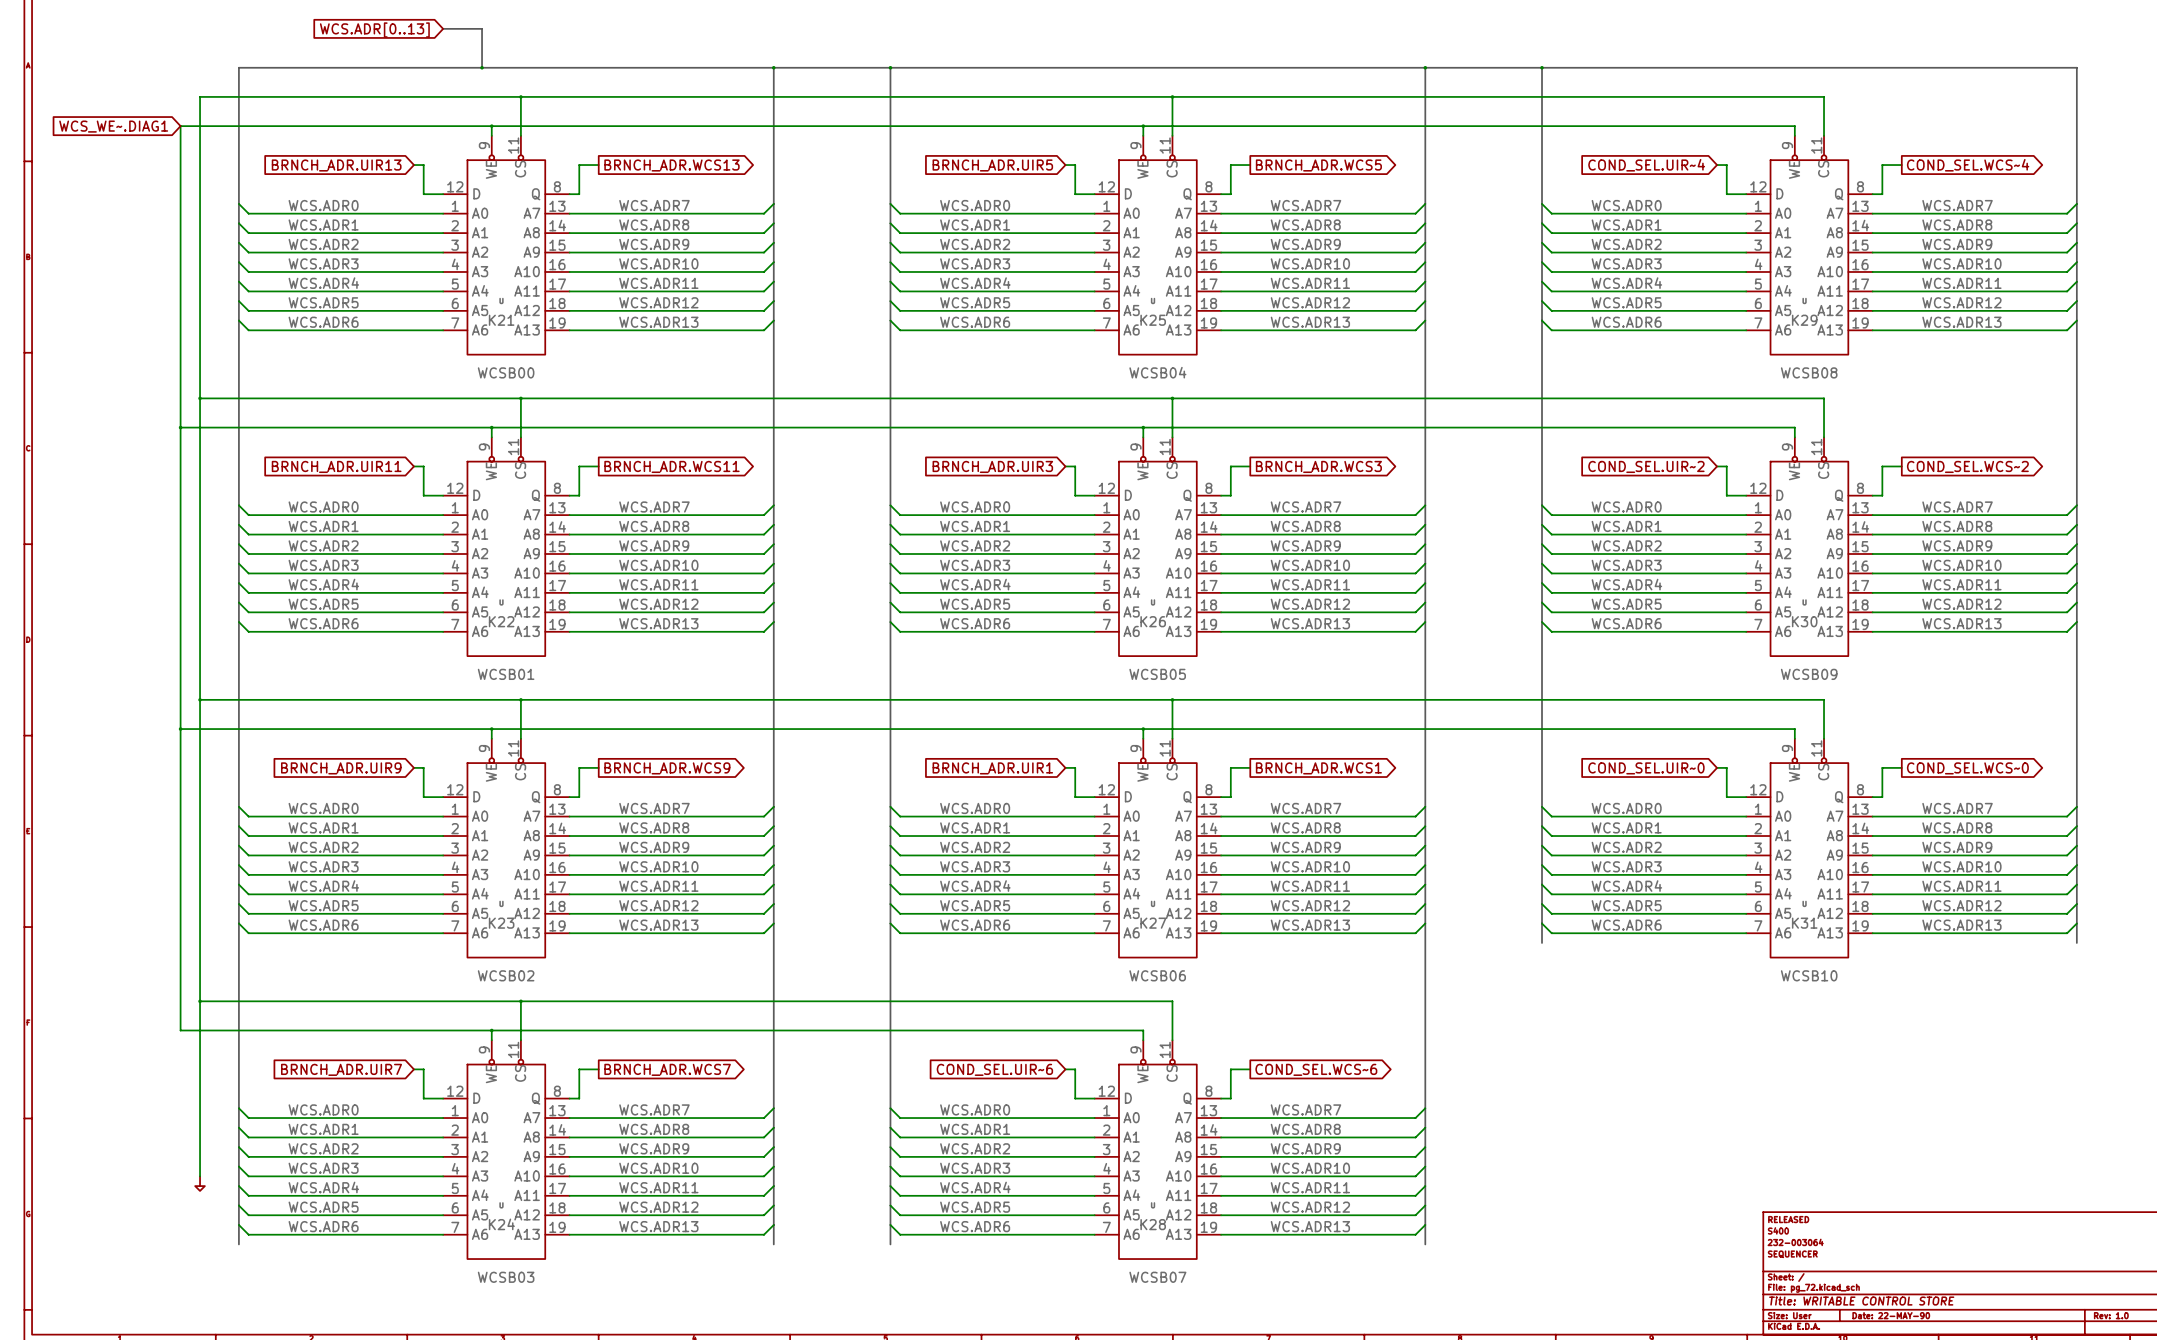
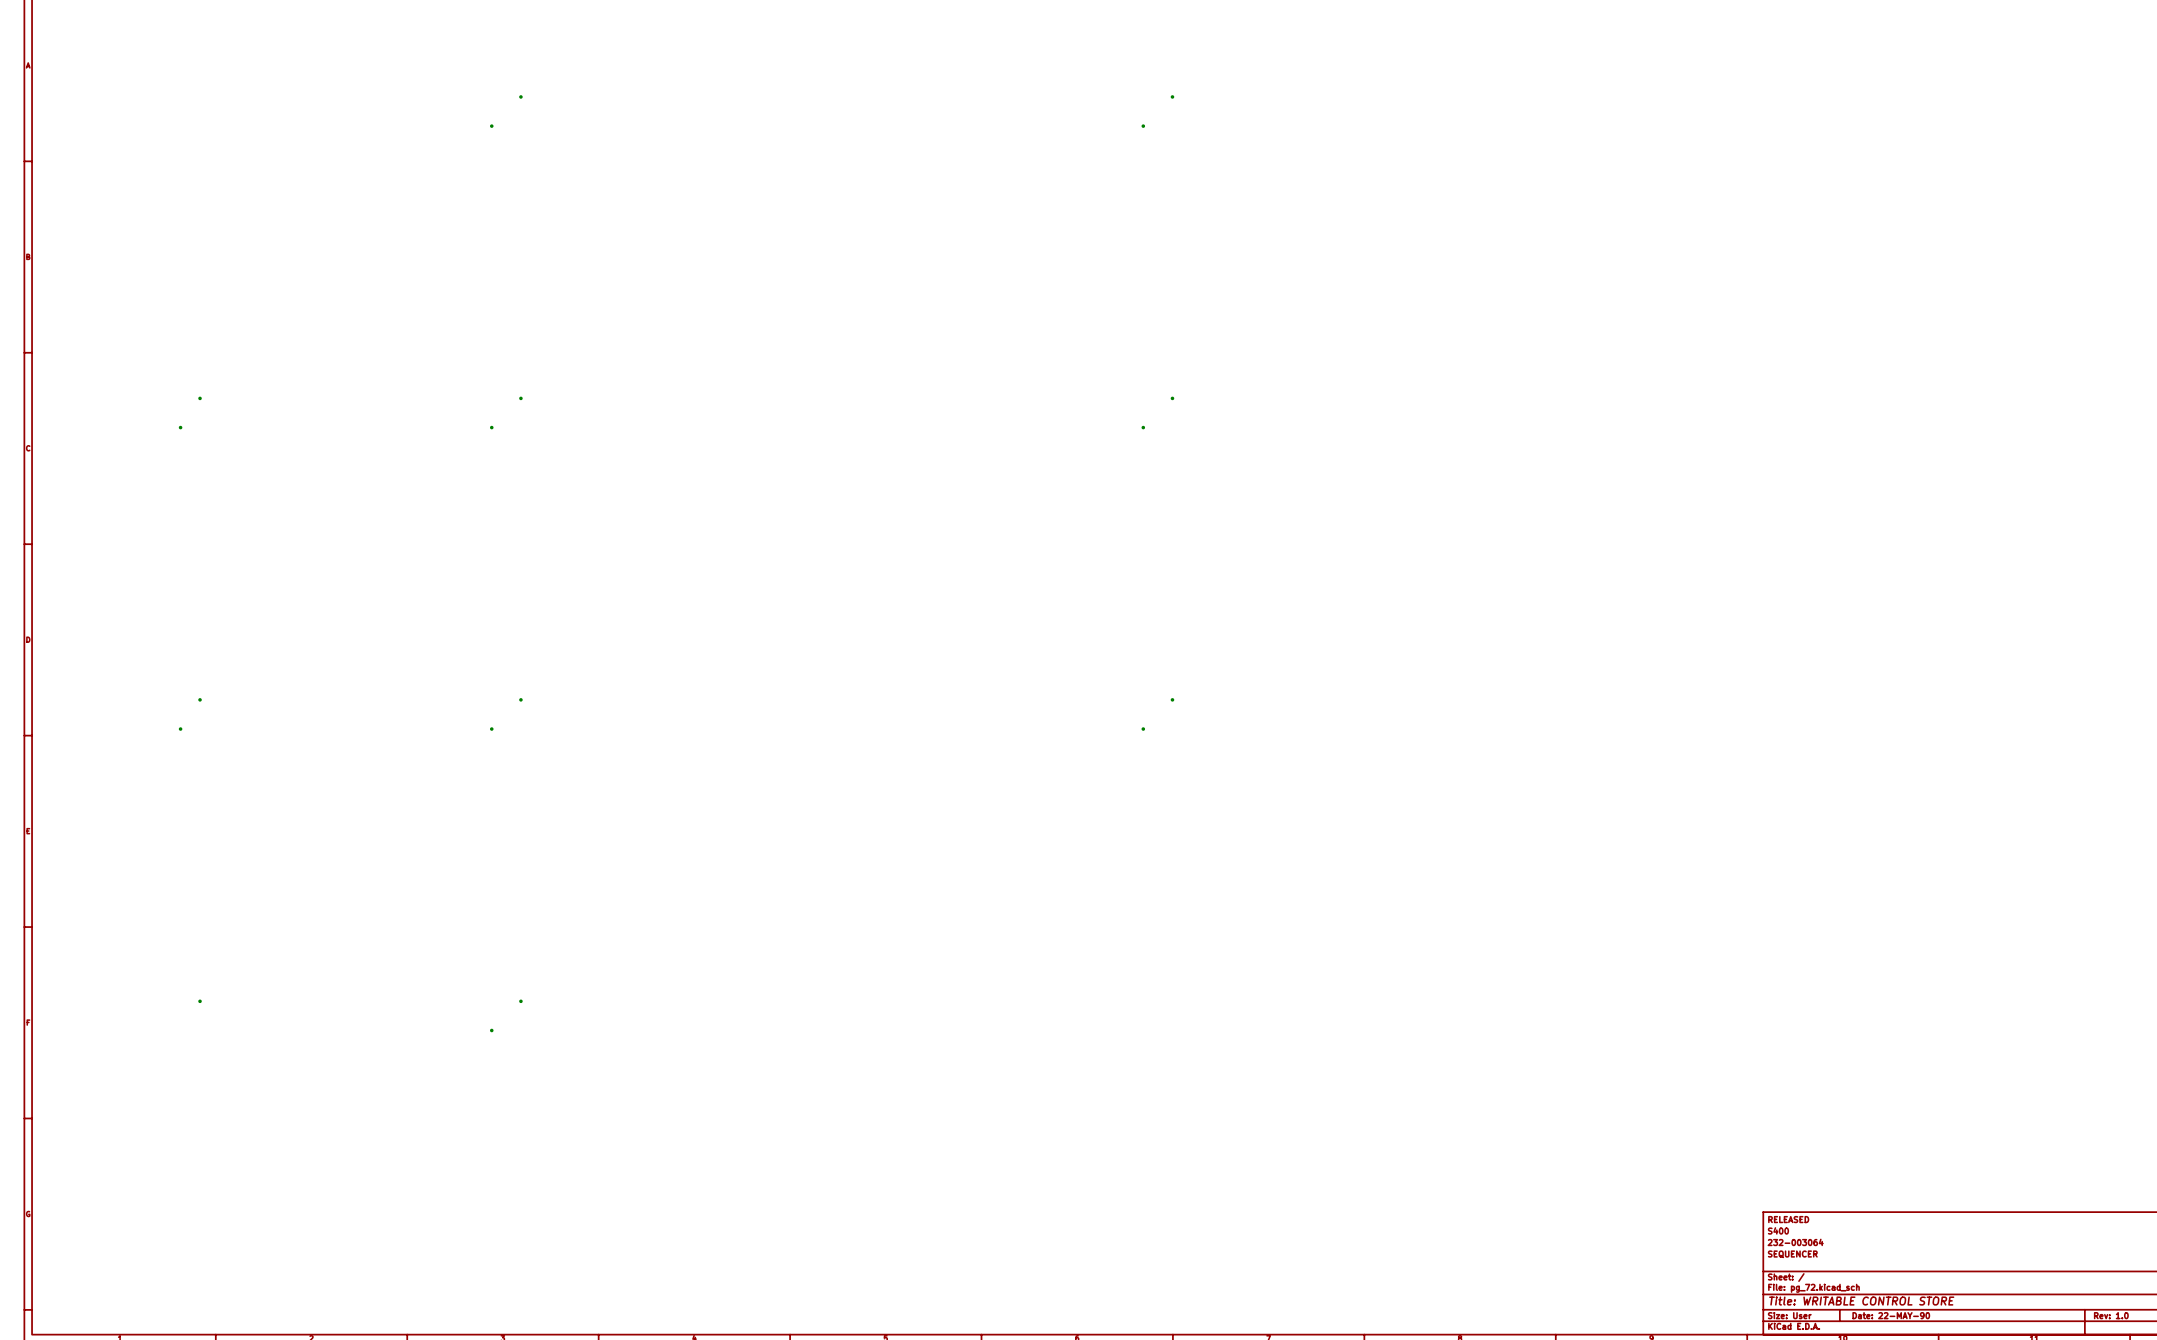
bus: (443, 28) (482, 28) (482, 67) -> none
global label: WCS.ADR[0..13] (374, 30) -> none
junction: (482, 67) -> none
bus: (773, 67) (773, 1244) -> none
junction: (773, 67) -> none
bus: (890, 67) (890, 1244) -> none
junction: (890, 67) -> none
bus: (1425, 67) (1425, 1244) -> none
junction: (1425, 67) -> none
bus: (1542, 67) (1542, 942) -> none
junction: (1542, 67) -> none
wire: (520, 96) (520, 135) -> none
wire: (1172, 96) (1172, 135) -> none
global label: WCS_WE~.DIAG1 (113, 126) -> none
wire: (491, 126) (491, 135) -> none
wire: (1143, 126) (1143, 135) -> none
wire: (1794, 135) (1794, 126) (180, 126) (180, 1030) (1143, 1030) (1143, 1040) -> none
wire: (1824, 135) (1824, 96) (200, 96) (200, 1176) -> none
global label: BRNCH_ADR.UIR13 (336, 165) -> none
wire: (413, 165) (423, 165) (423, 194) (443, 194) -> none
wire: (598, 165) (579, 165) (579, 194) (569, 194) -> none
global label: BRNCH_ADR.WCS13 (671, 165) -> none
global label: BRNCH_ADR.UIR5 (992, 165) -> none
wire: (1065, 165) (1075, 165) (1075, 194) (1094, 194) -> none
wire: (1250, 165) (1230, 165) (1230, 194) (1221, 194) -> none
global label: BRNCH_ADR.WCS5 (1318, 165) -> none
global label: COND_SEL.UIR~4 (1646, 165) -> none
wire: (1717, 165) (1726, 165) (1726, 194) (1746, 194) -> none
wire: (1901, 165) (1882, 165) (1882, 194) (1872, 194) -> none
global label: COND_SEL.WCS~4 (1968, 165) -> none
wire: (238, 203) (248, 213) (443, 213) -> none
wire: (773, 203) (764, 213) (569, 213) -> none
wire: (890, 203) (900, 213) (1094, 213) -> none
wire: (1425, 203) (1415, 213) (1221, 213) -> none
wire: (1542, 203) (1551, 213) (1746, 213) -> none
wire: (2076, 203) (2067, 213) (1872, 213) -> none
label: WCS.ADR0 (323, 205) -> none
label: WCS.ADR7 (654, 205) -> none
label: WCS.ADR0 (975, 205) -> none
label: WCS.ADR7 (1305, 205) -> none
label: WCS.ADR0 (1626, 205) -> none
label: WCS.ADR7 (1957, 205) -> none
wire: (238, 223) (248, 233) (443, 233) -> none
wire: (773, 223) (764, 233) (569, 233) -> none
wire: (890, 223) (900, 233) (1094, 233) -> none
wire: (1425, 223) (1415, 233) (1221, 233) -> none
wire: (1542, 223) (1551, 233) (1746, 233) -> none
wire: (2076, 223) (2067, 233) (1872, 233) -> none
label: WCS.ADR1 (323, 224) -> none
label: WCS.ADR8 (654, 224) -> none
label: WCS.ADR1 (975, 224) -> none
label: WCS.ADR8 (1305, 224) -> none
label: WCS.ADR1 (1626, 224) -> none
label: WCS.ADR8 (1957, 224) -> none
wire: (238, 242) (248, 252) (443, 252) -> none
wire: (773, 242) (764, 252) (569, 252) -> none
wire: (890, 242) (900, 252) (1094, 252) -> none
wire: (1425, 242) (1415, 252) (1221, 252) -> none
wire: (1542, 242) (1551, 252) (1746, 252) -> none
wire: (2076, 242) (2067, 252) (1872, 252) -> none
label: WCS.ADR2 (323, 244) -> none
label: WCS.ADR9 (654, 244) -> none
label: WCS.ADR2 (975, 244) -> none
label: WCS.ADR9 (1305, 244) -> none
label: WCS.ADR2 (1626, 244) -> none
label: WCS.ADR9 (1957, 244) -> none
part: (506, 245) -> none
part: (1157, 245) -> none
part: (1809, 245) -> none
wire: (238, 262) (248, 271) (443, 271) -> none
wire: (773, 262) (764, 271) (569, 271) -> none
wire: (890, 262) (900, 271) (1094, 271) -> none
wire: (1425, 262) (1415, 271) (1221, 271) -> none
wire: (1542, 262) (1551, 271) (1746, 271) -> none
wire: (2076, 262) (2067, 271) (1872, 271) -> none
label: WCS.ADR3 (323, 263) -> none
label: WCS.ADR10 (658, 263) -> none
label: WCS.ADR3 (975, 263) -> none
label: WCS.ADR10 (1310, 263) -> none
label: WCS.ADR3 (1626, 263) -> none
label: WCS.ADR10 (1961, 263) -> none
wire: (238, 281) (248, 291) (443, 291) -> none
wire: (773, 281) (764, 291) (569, 291) -> none
wire: (890, 281) (900, 291) (1094, 291) -> none
wire: (1425, 281) (1415, 291) (1221, 291) -> none
wire: (1542, 281) (1551, 291) (1746, 291) -> none
wire: (2076, 281) (2067, 291) (1872, 291) -> none
label: WCS.ADR4 (323, 283) -> none
label: WCS.ADR11 (658, 283) -> none
label: WCS.ADR4 (975, 283) -> none
label: WCS.ADR11 (1310, 283) -> none
label: WCS.ADR4 (1626, 283) -> none
label: WCS.ADR11 (1961, 283) -> none
wire: (238, 301) (248, 310) (443, 310) -> none
wire: (773, 301) (764, 310) (569, 310) -> none
wire: (890, 301) (900, 310) (1094, 310) -> none
wire: (1425, 301) (1415, 310) (1221, 310) -> none
wire: (1542, 301) (1551, 310) (1746, 310) -> none
wire: (2076, 301) (2067, 310) (1872, 310) -> none
label: WCS.ADR5 (323, 302) -> none
label: WCS.ADR12 (658, 302) -> none
label: WCS.ADR5 (975, 302) -> none
label: WCS.ADR12 (1310, 302) -> none
label: WCS.ADR5 (1626, 302) -> none
label: WCS.ADR12 (1961, 302) -> none
wire: (238, 320) (248, 330) (443, 330) -> none
wire: (773, 320) (764, 330) (569, 330) -> none
wire: (890, 320) (900, 330) (1094, 330) -> none
wire: (1425, 320) (1415, 330) (1221, 330) -> none
wire: (1542, 320) (1551, 330) (1746, 330) -> none
wire: (2076, 320) (2067, 330) (1872, 330) -> none
label: WCS.ADR6 (323, 322) -> none
label: WCS.ADR13 (658, 322) -> none
label: WCS.ADR6 (975, 322) -> none
label: WCS.ADR13 (1310, 322) -> none
label: WCS.ADR6 (1626, 322) -> none
label: WCS.ADR13 (1961, 322) -> none
wire: (200, 398) (1824, 398) (1824, 437) -> none
wire: (520, 398) (520, 437) -> none
wire: (1172, 398) (1172, 437) -> none
wire: (180, 427) (1794, 427) (1794, 437) -> none
wire: (491, 427) (491, 437) -> none
wire: (1143, 427) (1143, 437) -> none
global label: BRNCH_ADR.UIR11 (336, 466) -> none
wire: (413, 466) (423, 466) (423, 495) (443, 495) -> none
wire: (598, 466) (579, 466) (579, 495) (569, 495) -> none
global label: BRNCH_ADR.WCS11 (671, 466) -> none
global label: BRNCH_ADR.UIR3 (992, 466) -> none
wire: (1065, 466) (1075, 466) (1075, 495) (1094, 495) -> none
wire: (1250, 466) (1230, 466) (1230, 495) (1221, 495) -> none
global label: BRNCH_ADR.WCS3 (1318, 466) -> none
global label: COND_SEL.UIR~2 (1646, 466) -> none
wire: (1717, 466) (1726, 466) (1726, 495) (1746, 495) -> none
wire: (1901, 466) (1882, 466) (1882, 495) (1872, 495) -> none
global label: COND_SEL.WCS~2 (1967, 466) -> none
wire: (238, 505) (248, 515) (443, 515) -> none
wire: (773, 505) (764, 515) (569, 515) -> none
wire: (890, 505) (900, 515) (1094, 515) -> none
wire: (1425, 505) (1415, 515) (1221, 515) -> none
wire: (1542, 505) (1551, 515) (1746, 515) -> none
wire: (2076, 505) (2067, 515) (1872, 515) -> none
label: WCS.ADR0 (323, 507) -> none
label: WCS.ADR7 (654, 507) -> none
label: WCS.ADR0 (975, 507) -> none
label: WCS.ADR7 (1305, 507) -> none
label: WCS.ADR0 (1626, 507) -> none
label: WCS.ADR7 (1957, 507) -> none
wire: (238, 524) (248, 534) (443, 534) -> none
wire: (773, 524) (764, 534) (569, 534) -> none
wire: (890, 524) (900, 534) (1094, 534) -> none
wire: (1425, 524) (1415, 534) (1221, 534) -> none
wire: (1542, 524) (1551, 534) (1746, 534) -> none
wire: (2076, 524) (2067, 534) (1872, 534) -> none
label: WCS.ADR1 (323, 526) -> none
label: WCS.ADR8 (654, 526) -> none
label: WCS.ADR1 (975, 526) -> none
label: WCS.ADR8 (1305, 526) -> none
label: WCS.ADR1 (1626, 526) -> none
label: WCS.ADR8 (1957, 526) -> none
wire: (238, 544) (248, 554) (443, 554) -> none
wire: (773, 544) (764, 554) (569, 554) -> none
wire: (890, 544) (900, 554) (1094, 554) -> none
wire: (1425, 544) (1415, 554) (1221, 554) -> none
wire: (1542, 544) (1551, 554) (1746, 554) -> none
wire: (2076, 544) (2067, 554) (1872, 554) -> none
label: WCS.ADR2 (323, 545) -> none
label: WCS.ADR9 (654, 545) -> none
label: WCS.ADR2 (975, 545) -> none
label: WCS.ADR9 (1305, 545) -> none
label: WCS.ADR2 (1626, 545) -> none
label: WCS.ADR9 (1957, 545) -> none
part: (506, 546) -> none
part: (1157, 546) -> none
part: (1809, 546) -> none
wire: (238, 563) (248, 573) (443, 573) -> none
wire: (773, 563) (764, 573) (569, 573) -> none
wire: (890, 563) (900, 573) (1094, 573) -> none
wire: (1425, 563) (1415, 573) (1221, 573) -> none
wire: (1542, 563) (1551, 573) (1746, 573) -> none
wire: (2076, 563) (2067, 573) (1872, 573) -> none
label: WCS.ADR3 (323, 565) -> none
label: WCS.ADR10 (658, 565) -> none
label: WCS.ADR3 (975, 565) -> none
label: WCS.ADR10 (1310, 565) -> none
label: WCS.ADR3 (1626, 565) -> none
label: WCS.ADR10 (1961, 565) -> none
wire: (238, 583) (248, 592) (443, 592) -> none
wire: (773, 583) (764, 592) (569, 592) -> none
wire: (890, 583) (900, 592) (1094, 592) -> none
wire: (1425, 583) (1415, 592) (1221, 592) -> none
wire: (1542, 583) (1551, 592) (1746, 592) -> none
wire: (2076, 583) (2067, 592) (1872, 592) -> none
label: WCS.ADR4 (323, 584) -> none
label: WCS.ADR11 (658, 584) -> none
label: WCS.ADR4 (975, 584) -> none
label: WCS.ADR11 (1310, 584) -> none
label: WCS.ADR4 (1626, 584) -> none
label: WCS.ADR11 (1961, 584) -> none
wire: (238, 602) (248, 612) (443, 612) -> none
wire: (773, 602) (764, 612) (569, 612) -> none
wire: (890, 602) (900, 612) (1094, 612) -> none
wire: (1425, 602) (1415, 612) (1221, 612) -> none
wire: (1542, 602) (1551, 612) (1746, 612) -> none
wire: (2076, 602) (2067, 612) (1872, 612) -> none
label: WCS.ADR5 (323, 604) -> none
label: WCS.ADR12 (658, 604) -> none
label: WCS.ADR5 (975, 604) -> none
label: WCS.ADR12 (1310, 604) -> none
label: WCS.ADR5 (1626, 604) -> none
label: WCS.ADR12 (1961, 604) -> none
wire: (238, 622) (248, 631) (443, 631) -> none
wire: (773, 622) (764, 631) (569, 631) -> none
wire: (890, 622) (900, 631) (1094, 631) -> none
wire: (1425, 622) (1415, 631) (1221, 631) -> none
wire: (1542, 622) (1551, 631) (1746, 631) -> none
wire: (2076, 622) (2067, 631) (1872, 631) -> none
label: WCS.ADR6 (323, 623) -> none
label: WCS.ADR13 (658, 623) -> none
label: WCS.ADR6 (975, 623) -> none
label: WCS.ADR13 (1310, 623) -> none
label: WCS.ADR6 (1626, 623) -> none
label: WCS.ADR13 (1961, 623) -> none
wire: (200, 699) (1824, 699) (1824, 738) -> none
wire: (520, 699) (520, 738) -> none
wire: (1172, 699) (1172, 738) -> none
wire: (180, 729) (1794, 729) (1794, 738) -> none
wire: (491, 729) (491, 738) -> none
wire: (1143, 729) (1143, 738) -> none
wire: (413, 767) (423, 767) (423, 797) (443, 797) -> none
wire: (598, 767) (579, 767) (579, 797) (569, 797) -> none
wire: (1065, 767) (1075, 767) (1075, 797) (1094, 797) -> none
wire: (1250, 767) (1230, 767) (1230, 797) (1221, 797) -> none
wire: (1717, 767) (1726, 767) (1726, 797) (1746, 797) -> none
wire: (1901, 767) (1882, 767) (1882, 797) (1872, 797) -> none
global label: BRNCH_ADR.UIR9 (341, 768) -> none
global label: BRNCH_ADR.WCS9 (667, 768) -> none
global label: BRNCH_ADR.UIR1 (992, 768) -> none
global label: BRNCH_ADR.WCS1 (1318, 768) -> none
global label: COND_SEL.UIR~0 (1646, 768) -> none
global label: COND_SEL.WCS~0 (1967, 768) -> none
wire: (238, 806) (248, 816) (443, 816) -> none
wire: (773, 806) (764, 816) (569, 816) -> none
wire: (890, 806) (900, 816) (1094, 816) -> none
wire: (1425, 806) (1415, 816) (1221, 816) -> none
wire: (1542, 806) (1551, 816) (1746, 816) -> none
wire: (2076, 806) (2067, 816) (1872, 816) -> none
label: WCS.ADR0 (323, 808) -> none
label: WCS.ADR7 (654, 808) -> none
label: WCS.ADR0 (975, 808) -> none
label: WCS.ADR7 (1305, 808) -> none
label: WCS.ADR0 (1626, 808) -> none
label: WCS.ADR7 (1957, 808) -> none
wire: (238, 826) (248, 836) (443, 836) -> none
wire: (773, 826) (764, 836) (569, 836) -> none
wire: (890, 826) (900, 836) (1094, 836) -> none
wire: (1425, 826) (1415, 836) (1221, 836) -> none
wire: (1542, 826) (1551, 836) (1746, 836) -> none
wire: (2076, 826) (2067, 836) (1872, 836) -> none
label: WCS.ADR1 (323, 827) -> none
label: WCS.ADR8 (654, 827) -> none
label: WCS.ADR1 (975, 827) -> none
label: WCS.ADR8 (1305, 827) -> none
label: WCS.ADR1 (1626, 827) -> none
label: WCS.ADR8 (1957, 827) -> none
wire: (238, 845) (248, 855) (443, 855) -> none
wire: (773, 845) (764, 855) (569, 855) -> none
wire: (890, 845) (900, 855) (1094, 855) -> none
wire: (1425, 845) (1415, 855) (1221, 855) -> none
wire: (1542, 845) (1551, 855) (1746, 855) -> none
wire: (2076, 845) (2067, 855) (1872, 855) -> none
label: WCS.ADR2 (323, 847) -> none
label: WCS.ADR9 (654, 847) -> none
label: WCS.ADR2 (975, 847) -> none
label: WCS.ADR9 (1305, 847) -> none
label: WCS.ADR2 (1626, 847) -> none
label: WCS.ADR9 (1957, 847) -> none
part: (506, 848) -> none
part: (1157, 848) -> none
part: (1809, 848) -> none
wire: (238, 865) (248, 874) (443, 874) -> none
wire: (773, 865) (764, 874) (569, 874) -> none
wire: (890, 865) (900, 874) (1094, 874) -> none
wire: (1425, 865) (1415, 874) (1221, 874) -> none
wire: (1542, 865) (1551, 874) (1746, 874) -> none
wire: (2076, 865) (2067, 874) (1872, 874) -> none
label: WCS.ADR3 (323, 866) -> none
label: WCS.ADR10 (658, 866) -> none
label: WCS.ADR3 (975, 866) -> none
label: WCS.ADR10 (1310, 866) -> none
label: WCS.ADR3 (1626, 866) -> none
label: WCS.ADR10 (1961, 866) -> none
wire: (238, 884) (248, 894) (443, 894) -> none
wire: (773, 884) (764, 894) (569, 894) -> none
wire: (890, 884) (900, 894) (1094, 894) -> none
wire: (1425, 884) (1415, 894) (1221, 894) -> none
wire: (1542, 884) (1551, 894) (1746, 894) -> none
wire: (2076, 884) (2067, 894) (1872, 894) -> none
label: WCS.ADR4 (323, 886) -> none
label: WCS.ADR11 (658, 886) -> none
label: WCS.ADR4 (975, 886) -> none
label: WCS.ADR11 (1310, 886) -> none
label: WCS.ADR4 (1626, 886) -> none
label: WCS.ADR11 (1961, 886) -> none
wire: (238, 904) (248, 913) (443, 913) -> none
wire: (773, 904) (764, 913) (569, 913) -> none
wire: (890, 904) (900, 913) (1094, 913) -> none
wire: (1425, 904) (1415, 913) (1221, 913) -> none
wire: (1542, 904) (1551, 913) (1746, 913) -> none
wire: (2076, 904) (2067, 913) (1872, 913) -> none
label: WCS.ADR5 (323, 905) -> none
label: WCS.ADR12 (658, 905) -> none
label: WCS.ADR5 (975, 905) -> none
label: WCS.ADR12 (1310, 905) -> none
label: WCS.ADR5 (1626, 905) -> none
label: WCS.ADR12 (1961, 905) -> none
wire: (238, 923) (248, 933) (443, 933) -> none
wire: (773, 923) (764, 933) (569, 933) -> none
wire: (890, 923) (900, 933) (1094, 933) -> none
wire: (1425, 923) (1415, 933) (1221, 933) -> none
wire: (1542, 923) (1551, 933) (1746, 933) -> none
wire: (2076, 923) (2067, 933) (1872, 933) -> none
label: WCS.ADR6 (323, 925) -> none
label: WCS.ADR13 (658, 925) -> none
label: WCS.ADR6 (975, 925) -> none
label: WCS.ADR13 (1310, 925) -> none
label: WCS.ADR6 (1626, 925) -> none
label: WCS.ADR13 (1961, 925) -> none
bus: (2076, 942) (2076, 67) (238, 67) (238, 1244) -> none
wire: (200, 1001) (1172, 1001) (1172, 1040) -> none
wire: (520, 1001) (520, 1040) -> none
wire: (491, 1030) (491, 1040) -> none
global label: BRNCH_ADR.UIR7 (341, 1069) -> none
wire: (413, 1069) (423, 1069) (423, 1098) (443, 1098) -> none
wire: (598, 1069) (579, 1069) (579, 1098) (569, 1098) -> none
global label: BRNCH_ADR.WCS7 (667, 1069) -> none
global label: COND_SEL.UIR~6 (994, 1069) -> none
wire: (1065, 1069) (1075, 1069) (1075, 1098) (1094, 1098) -> none
wire: (1250, 1069) (1230, 1069) (1230, 1098) (1221, 1098) -> none
global label: COND_SEL.WCS~6 (1316, 1069) -> none
wire: (238, 1108) (248, 1118) (443, 1118) -> none
wire: (773, 1108) (764, 1118) (569, 1118) -> none
wire: (890, 1108) (900, 1118) (1094, 1118) -> none
wire: (1425, 1108) (1415, 1118) (1221, 1118) -> none
label: WCS.ADR0 (323, 1109) -> none
label: WCS.ADR7 (654, 1109) -> none
label: WCS.ADR0 (975, 1109) -> none
label: WCS.ADR7 (1305, 1109) -> none
wire: (238, 1127) (248, 1137) (443, 1137) -> none
wire: (773, 1127) (764, 1137) (569, 1137) -> none
wire: (890, 1127) (900, 1137) (1094, 1137) -> none
wire: (1425, 1127) (1415, 1137) (1221, 1137) -> none
label: WCS.ADR1 (323, 1129) -> none
label: WCS.ADR8 (654, 1129) -> none
label: WCS.ADR1 (975, 1129) -> none
label: WCS.ADR8 (1305, 1129) -> none
wire: (238, 1147) (248, 1156) (443, 1156) -> none
wire: (773, 1147) (764, 1156) (569, 1156) -> none
wire: (890, 1147) (900, 1156) (1094, 1156) -> none
wire: (1425, 1147) (1415, 1156) (1221, 1156) -> none
label: WCS.ADR2 (323, 1148) -> none
label: WCS.ADR9 (654, 1148) -> none
label: WCS.ADR2 (975, 1148) -> none
label: WCS.ADR9 (1305, 1148) -> none
part: (506, 1149) -> none
part: (1157, 1149) -> none
wire: (238, 1166) (248, 1176) (443, 1176) -> none
wire: (773, 1166) (764, 1176) (569, 1176) -> none
wire: (890, 1166) (900, 1176) (1094, 1176) -> none
wire: (1425, 1166) (1415, 1176) (1221, 1176) -> none
label: WCS.ADR3 (323, 1168) -> none
label: WCS.ADR10 (658, 1168) -> none
label: WCS.ADR3 (975, 1168) -> none
label: WCS.ADR10 (1310, 1168) -> none
power symbol: (200, 1183) -> none
wire: (238, 1186) (248, 1195) (443, 1195) -> none
wire: (773, 1186) (764, 1195) (569, 1195) -> none
wire: (890, 1186) (900, 1195) (1094, 1195) -> none
wire: (1425, 1186) (1415, 1195) (1221, 1195) -> none
label: WCS.ADR4 (323, 1187) -> none
label: WCS.ADR11 (658, 1187) -> none
label: WCS.ADR4 (975, 1187) -> none
label: WCS.ADR11 (1310, 1187) -> none
wire: (238, 1205) (248, 1215) (443, 1215) -> none
wire: (773, 1205) (764, 1215) (569, 1215) -> none
wire: (890, 1205) (900, 1215) (1094, 1215) -> none
wire: (1425, 1205) (1415, 1215) (1221, 1215) -> none
label: WCS.ADR5 (323, 1207) -> none
label: WCS.ADR12 (658, 1207) -> none
label: WCS.ADR5 (975, 1207) -> none
label: WCS.ADR12 (1310, 1207) -> none
wire: (238, 1224) (248, 1234) (443, 1234) -> none
wire: (773, 1224) (764, 1234) (569, 1234) -> none
wire: (890, 1224) (900, 1234) (1094, 1234) -> none
wire: (1425, 1224) (1415, 1234) (1221, 1234) -> none
label: WCS.ADR6 (323, 1226) -> none
label: WCS.ADR13 (658, 1226) -> none
label: WCS.ADR6 (975, 1226) -> none
label: WCS.ADR13 (1310, 1226) -> none

